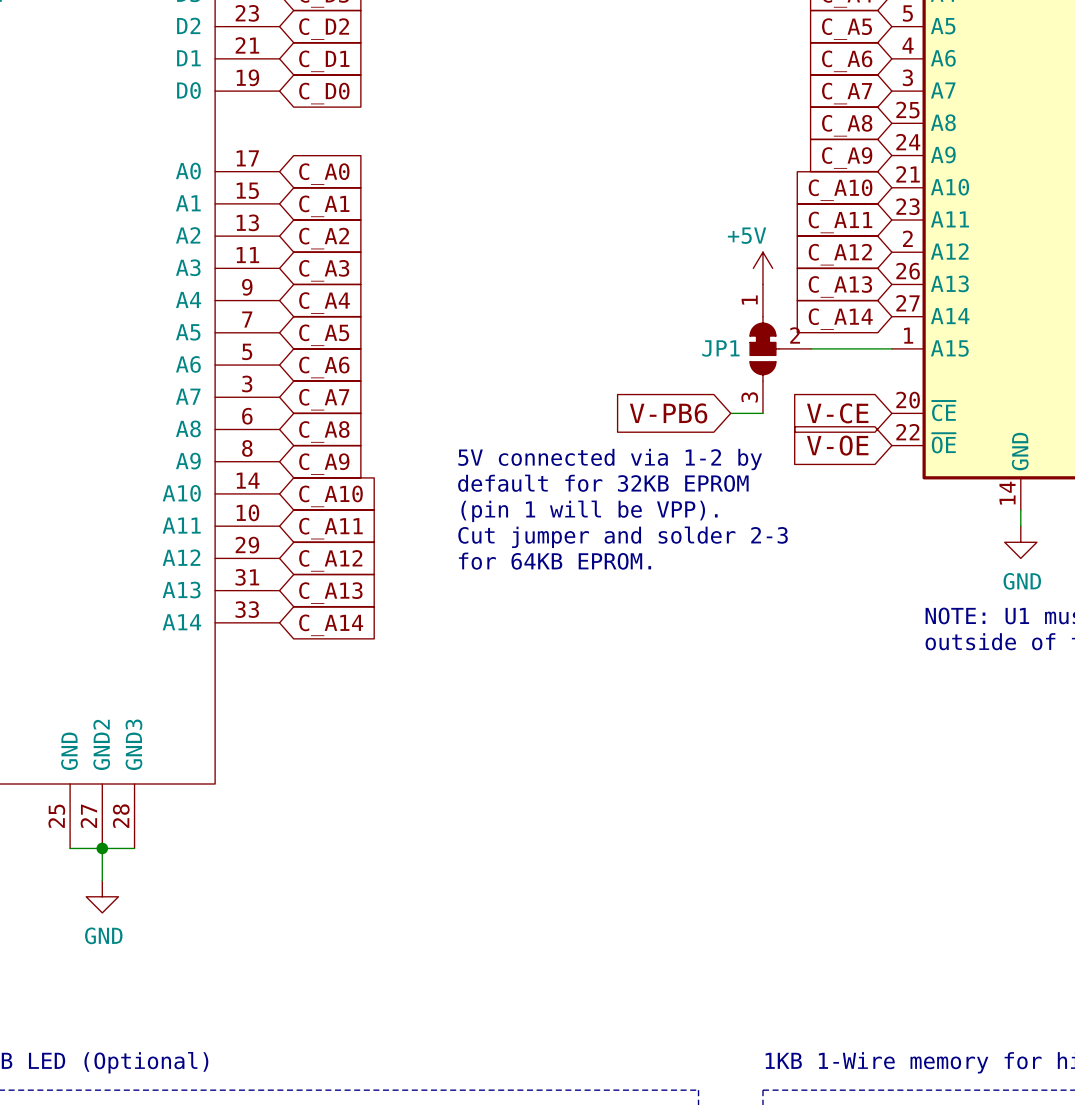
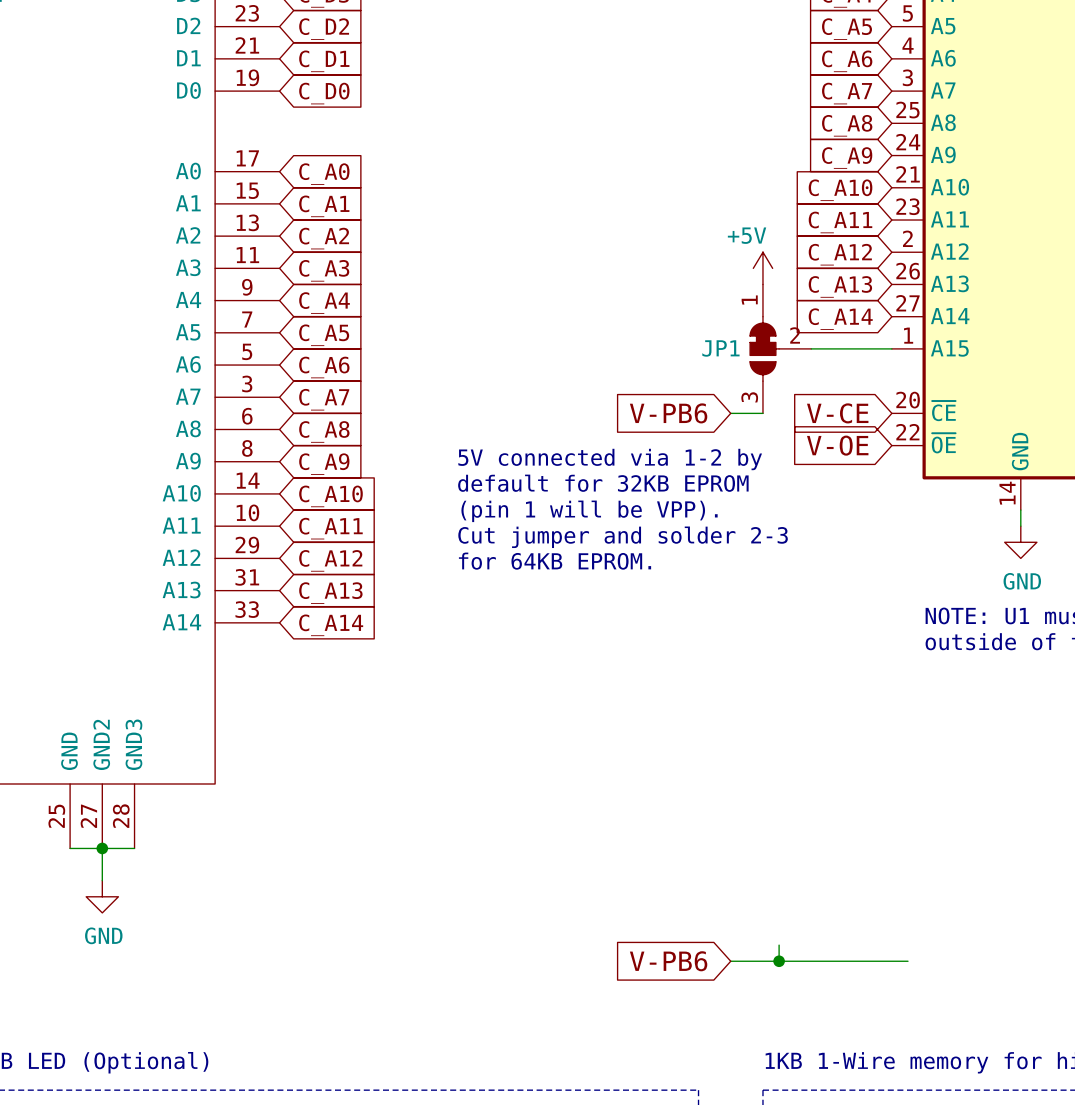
wire: none -> (779, 945) (779, 961)
global label: none -> V-PB6 (668, 961)
wire: none -> (730, 961) (908, 961)
junction: none -> (779, 961)

